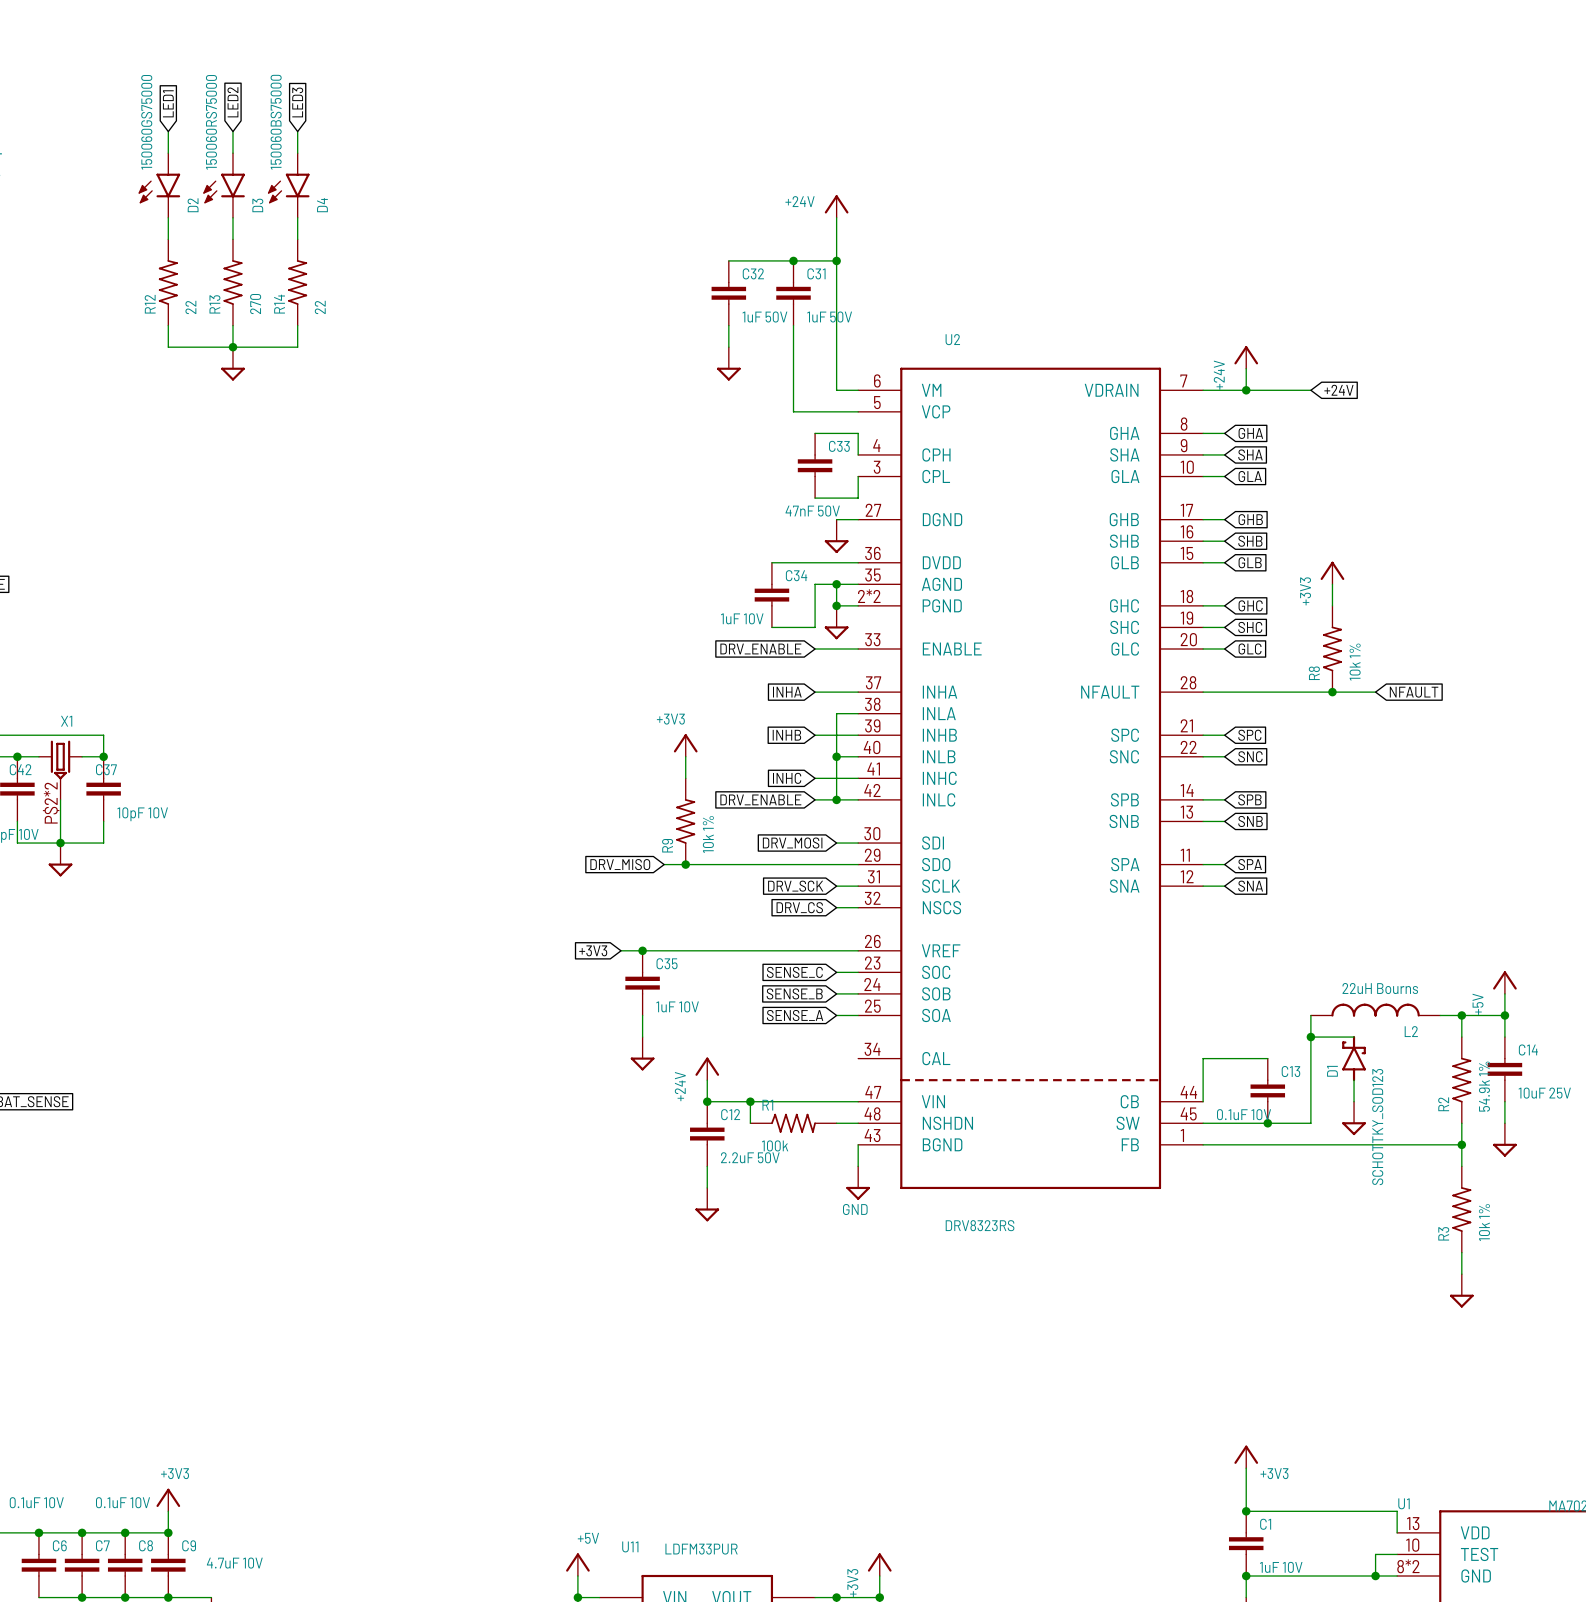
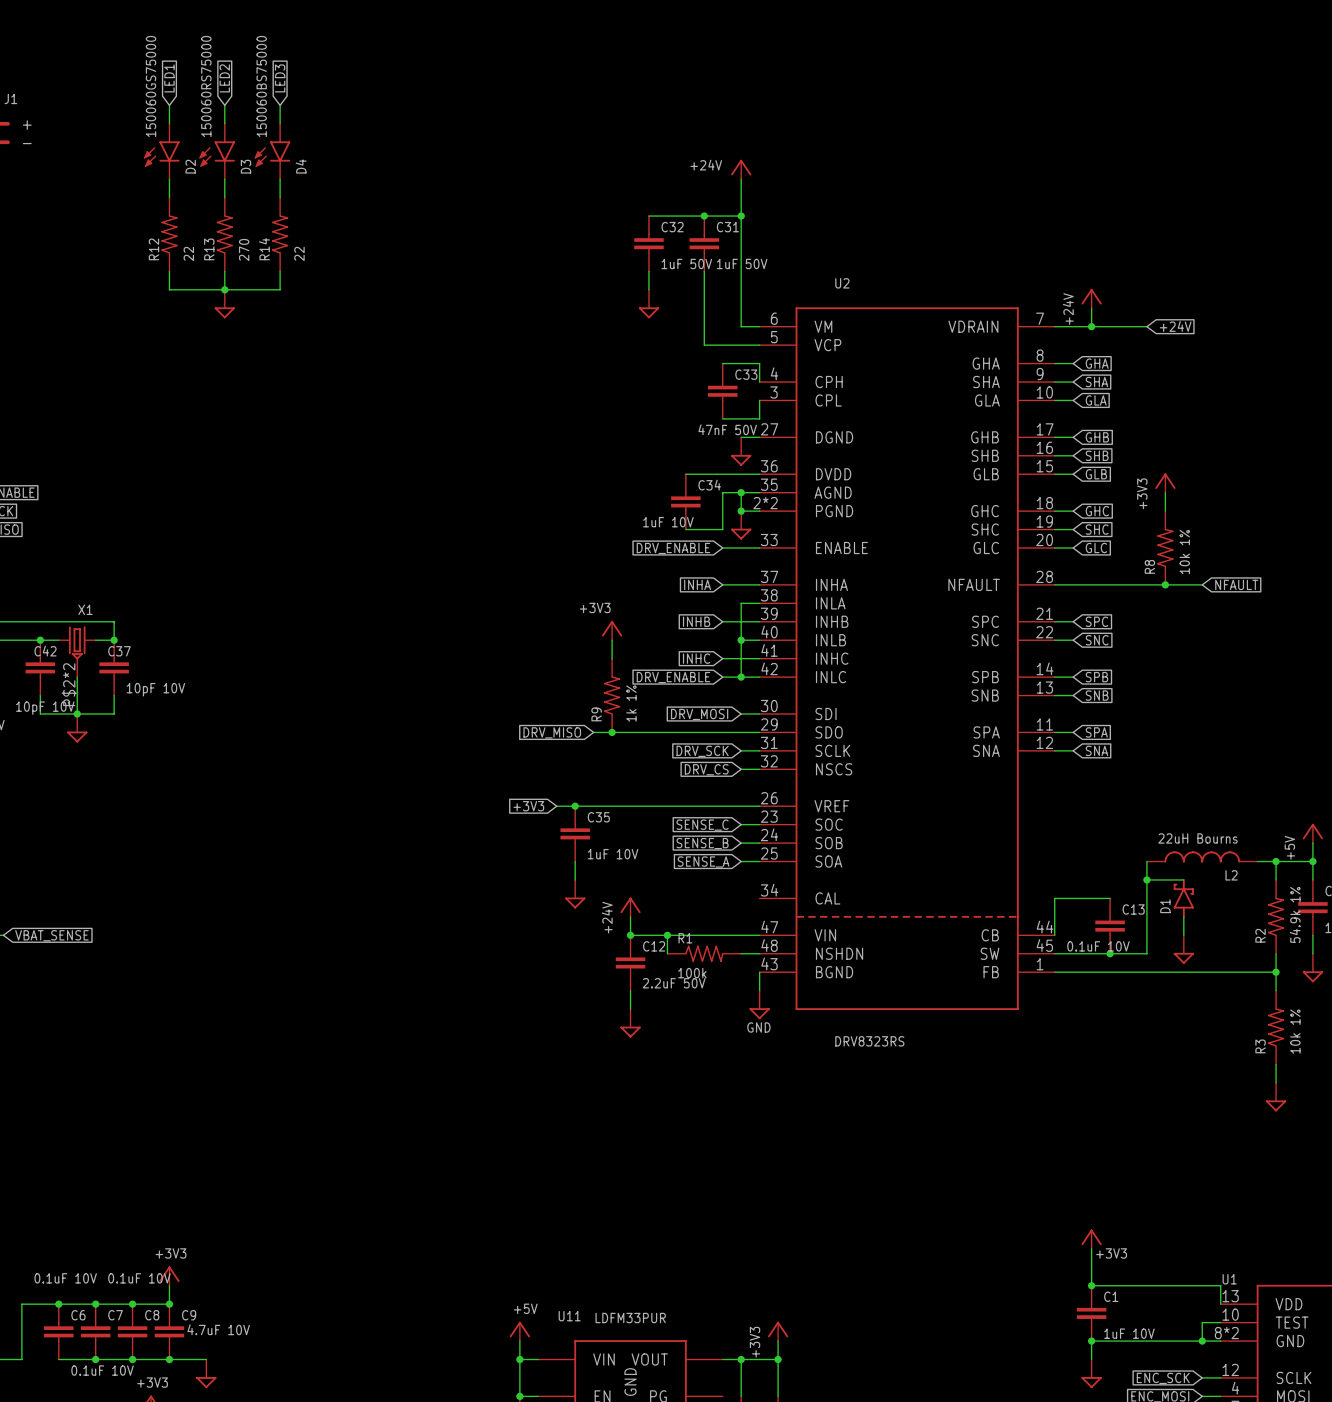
R9 value: 10k 1% (708, 834) -> 1k 1% (631, 703)
D1 value: SCHOTTKY_SOD123 (1377, 1127) -> none

